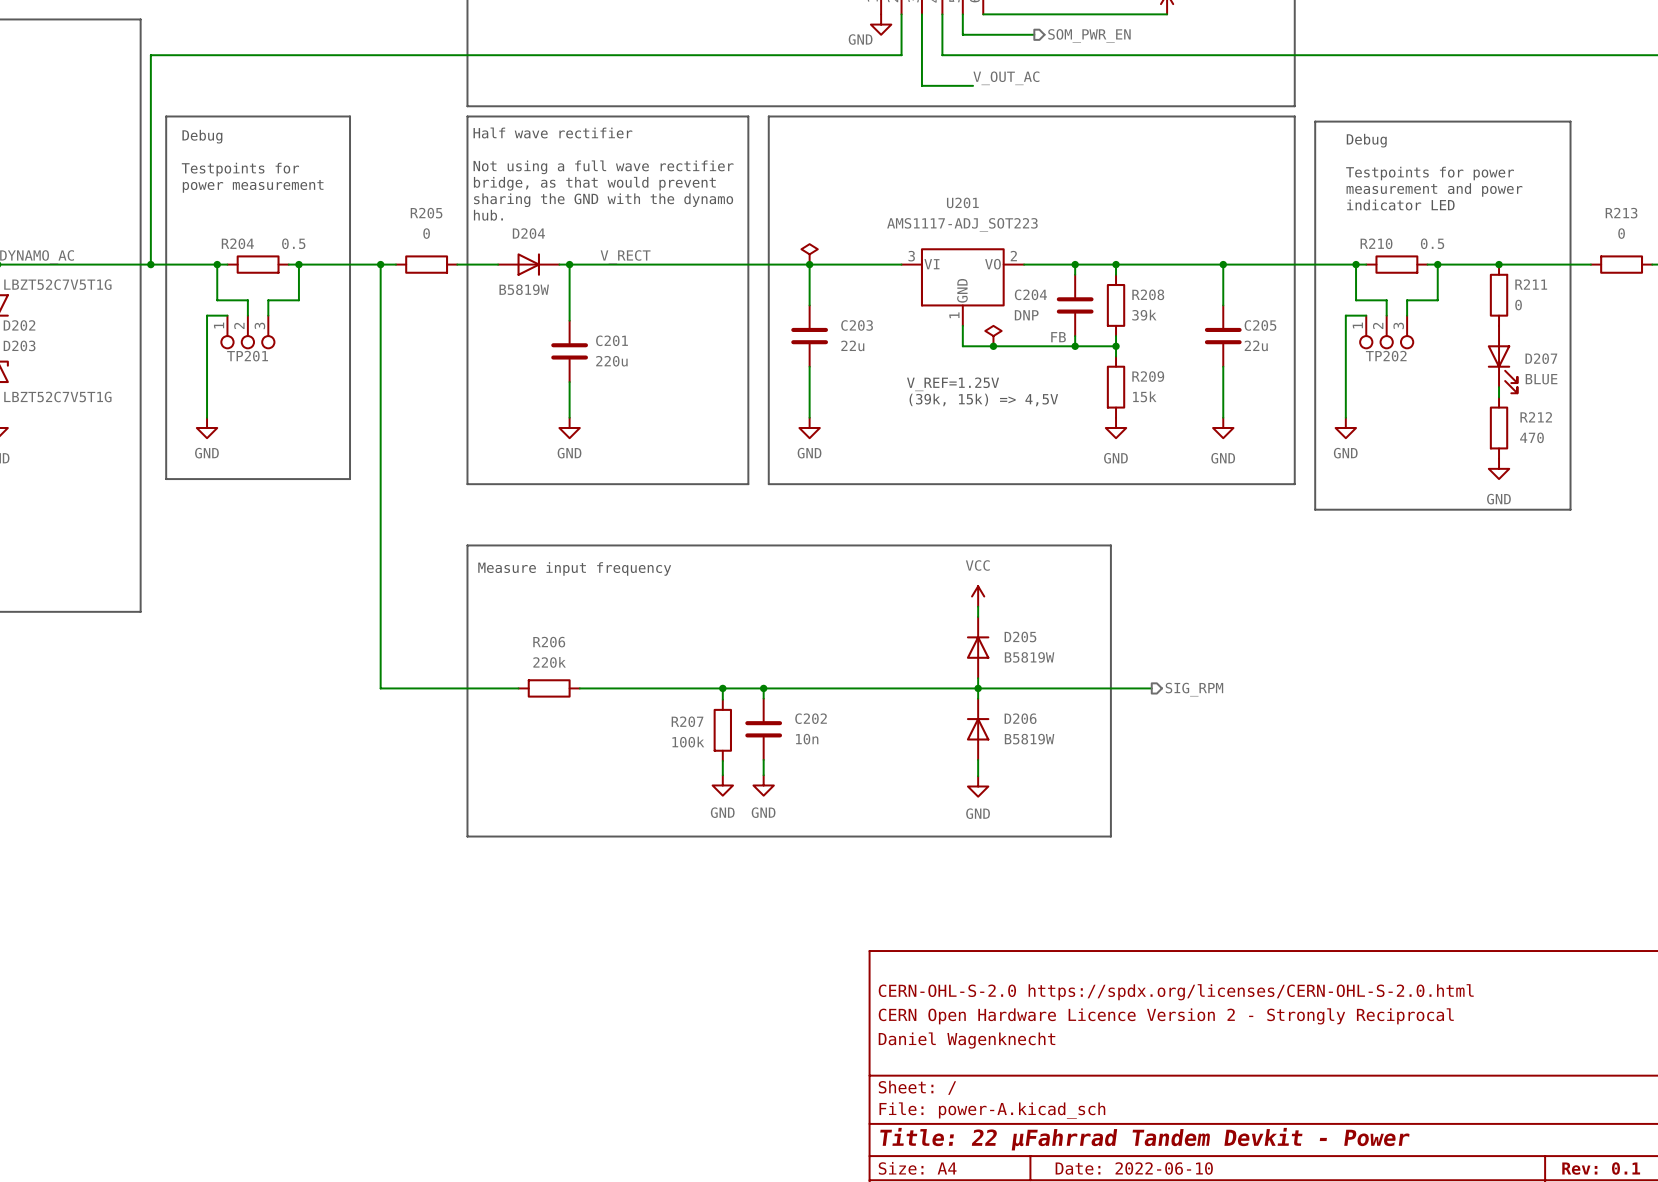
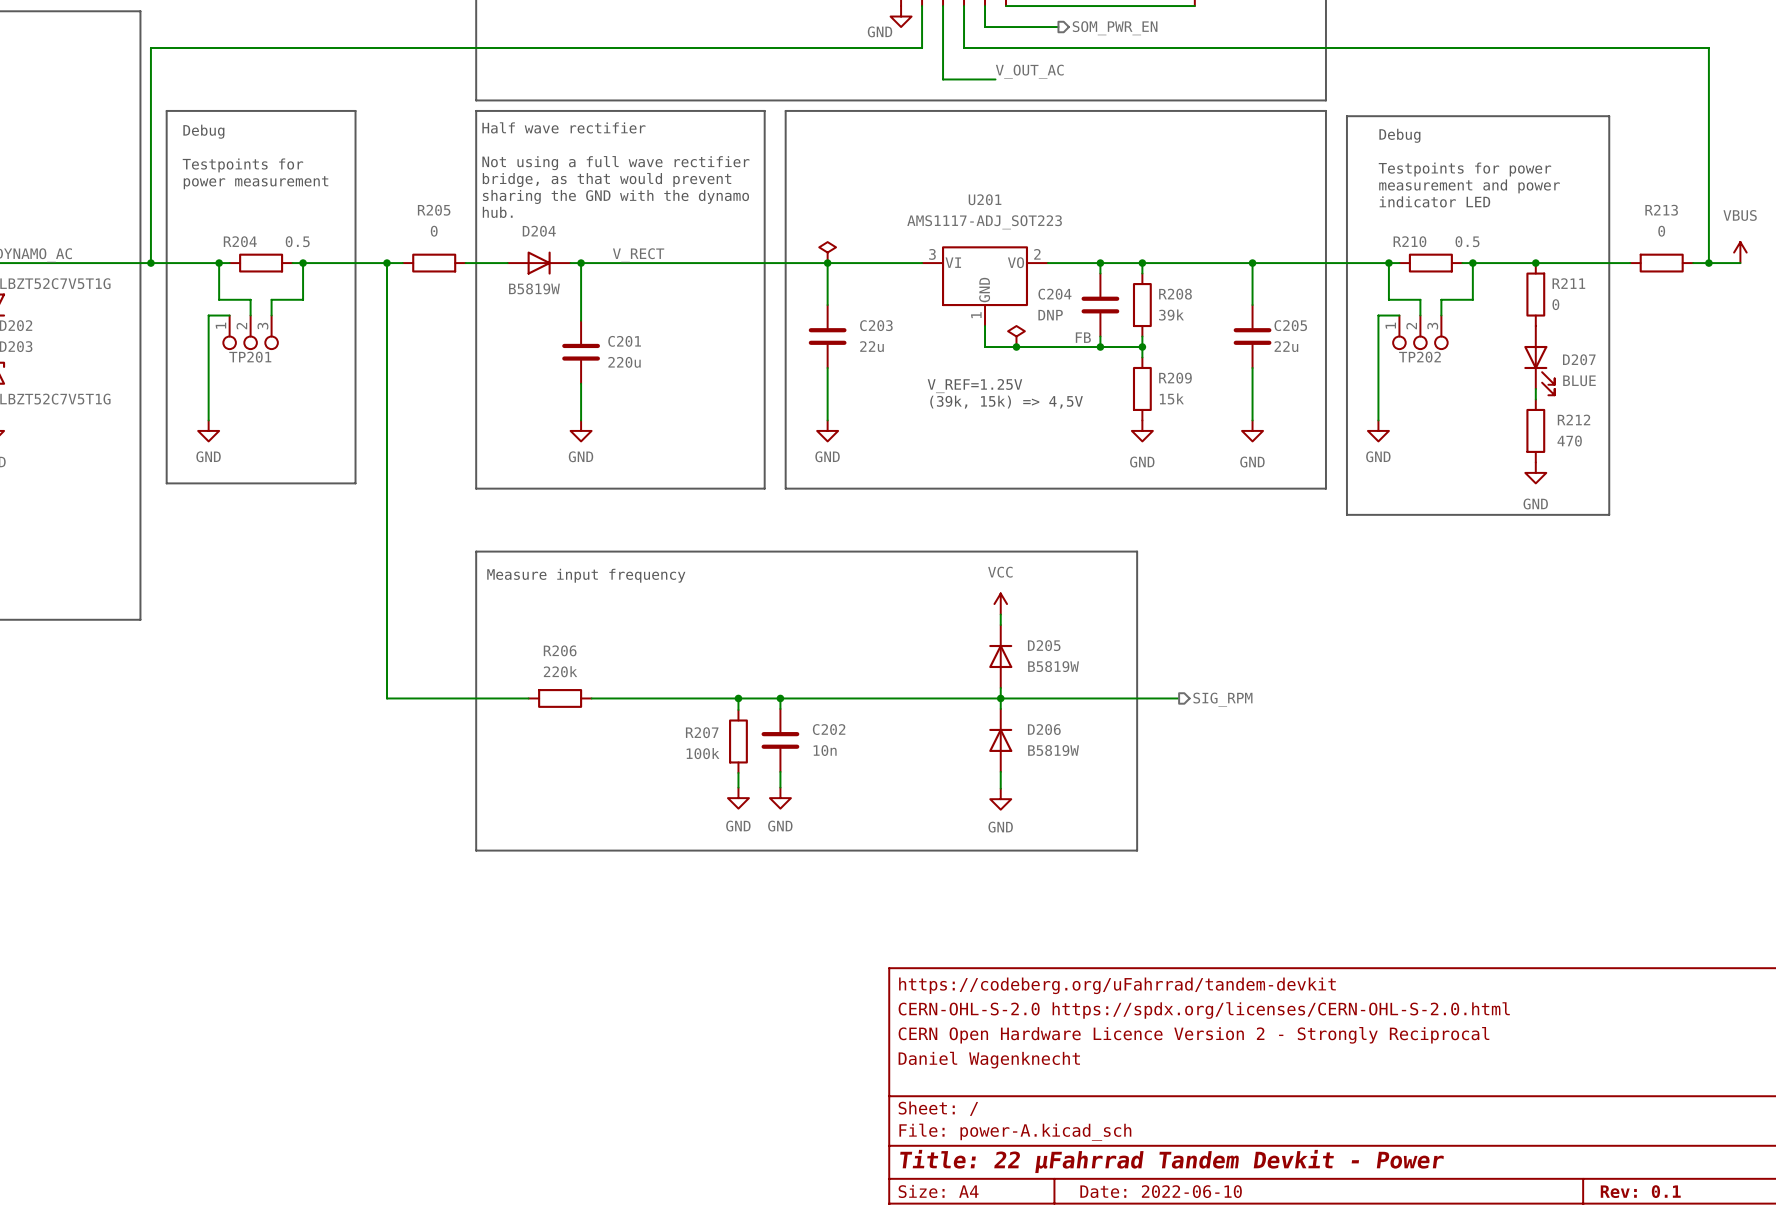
title block: none -> https://codeberg.org/uFahrrad/tandem-devkit (1117, 985)

